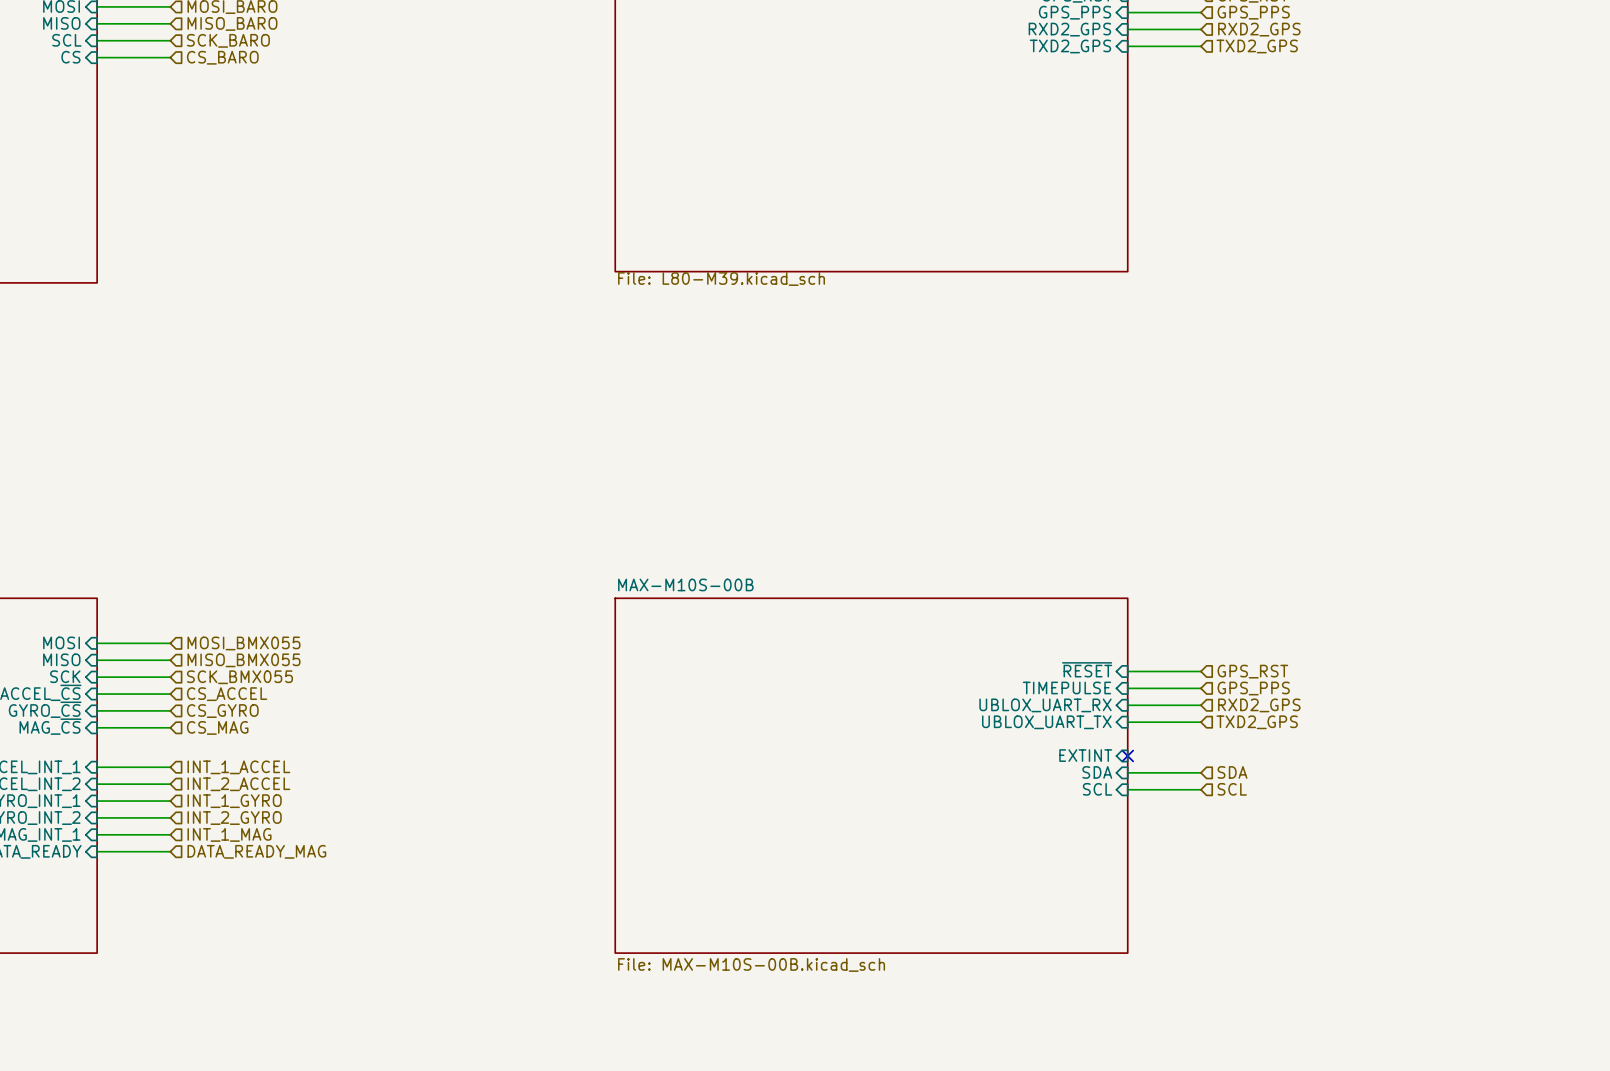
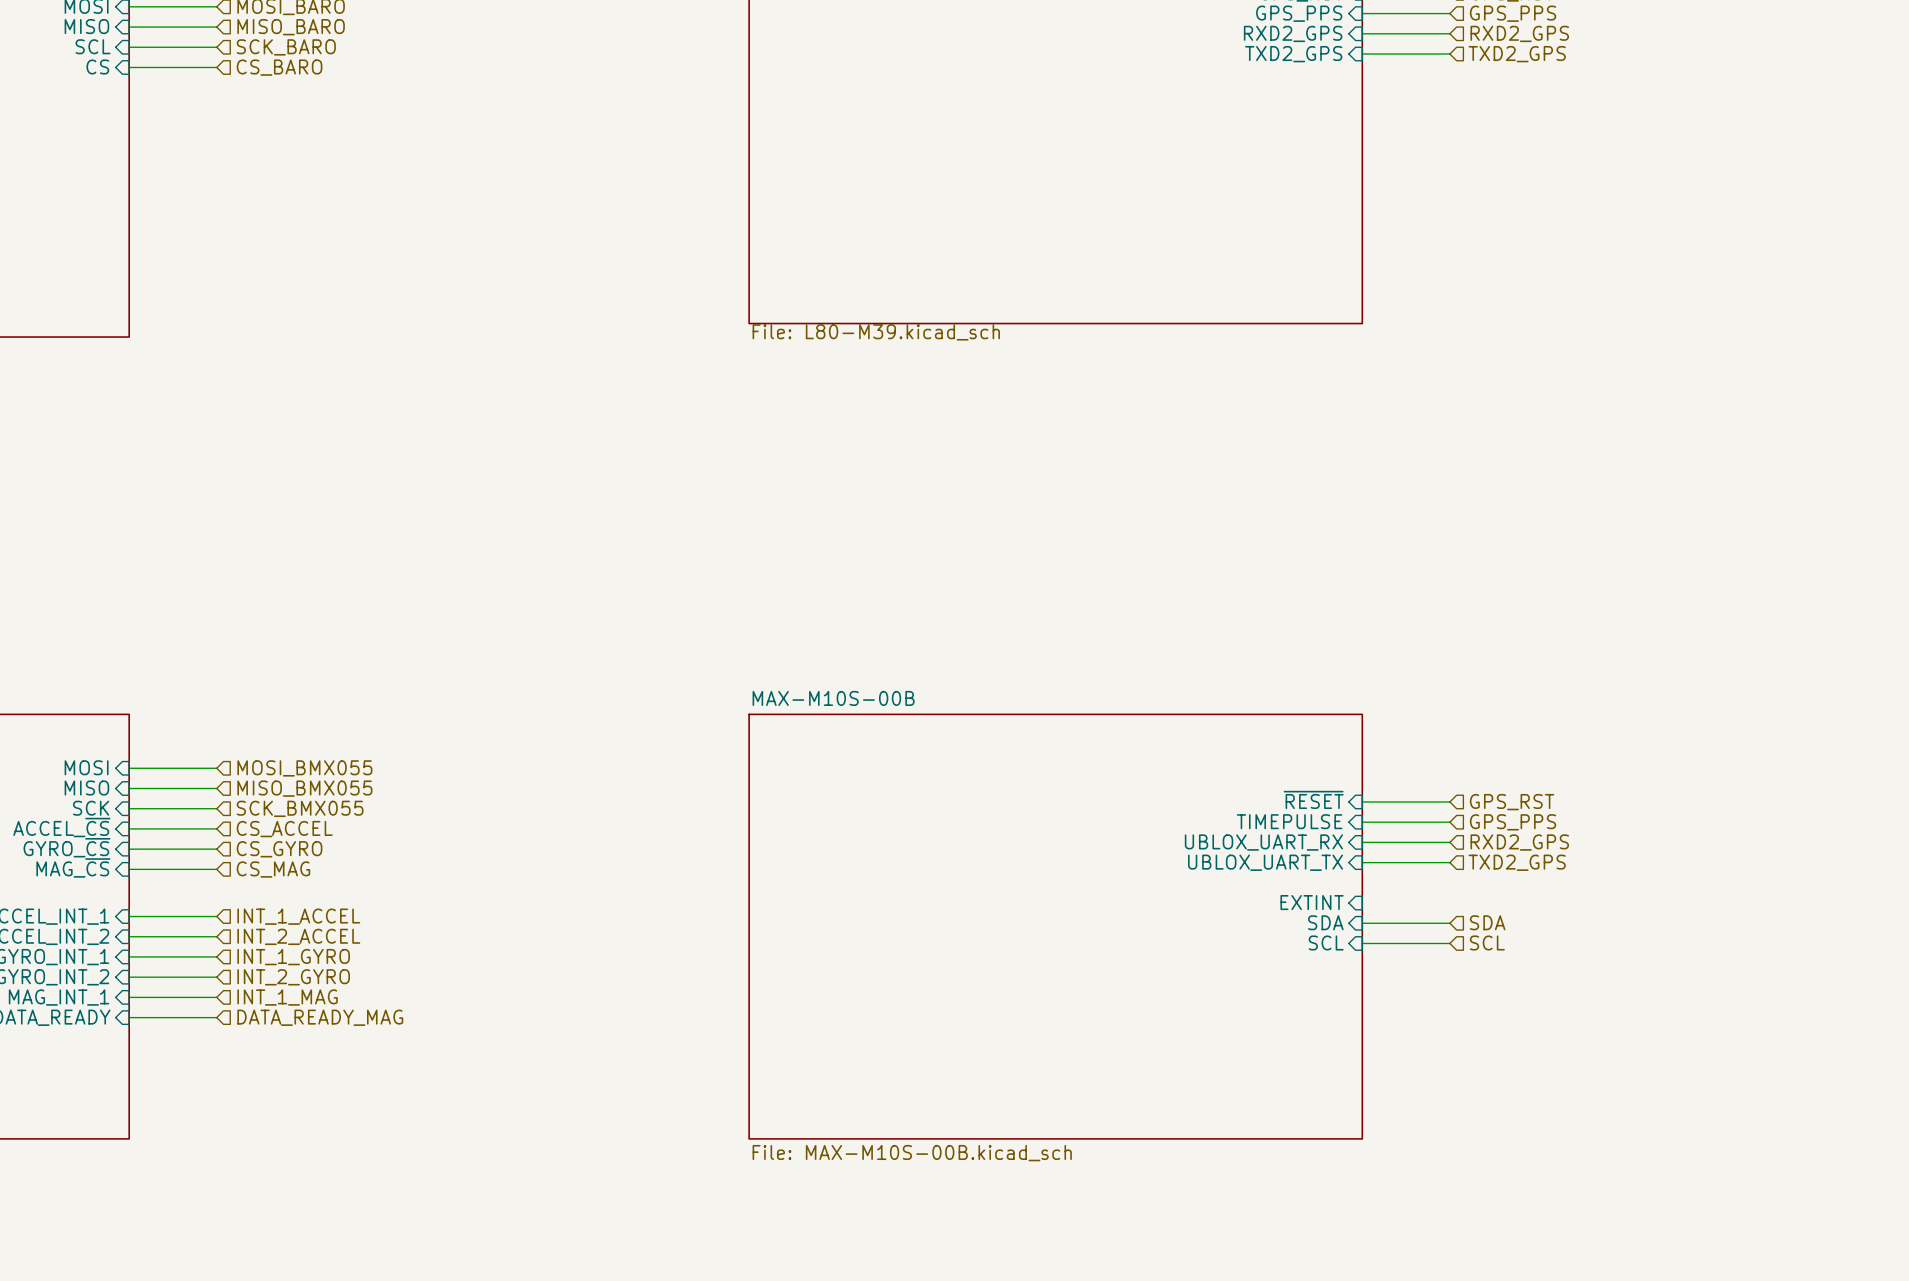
no-connect mark: (1127, 755) -> none

